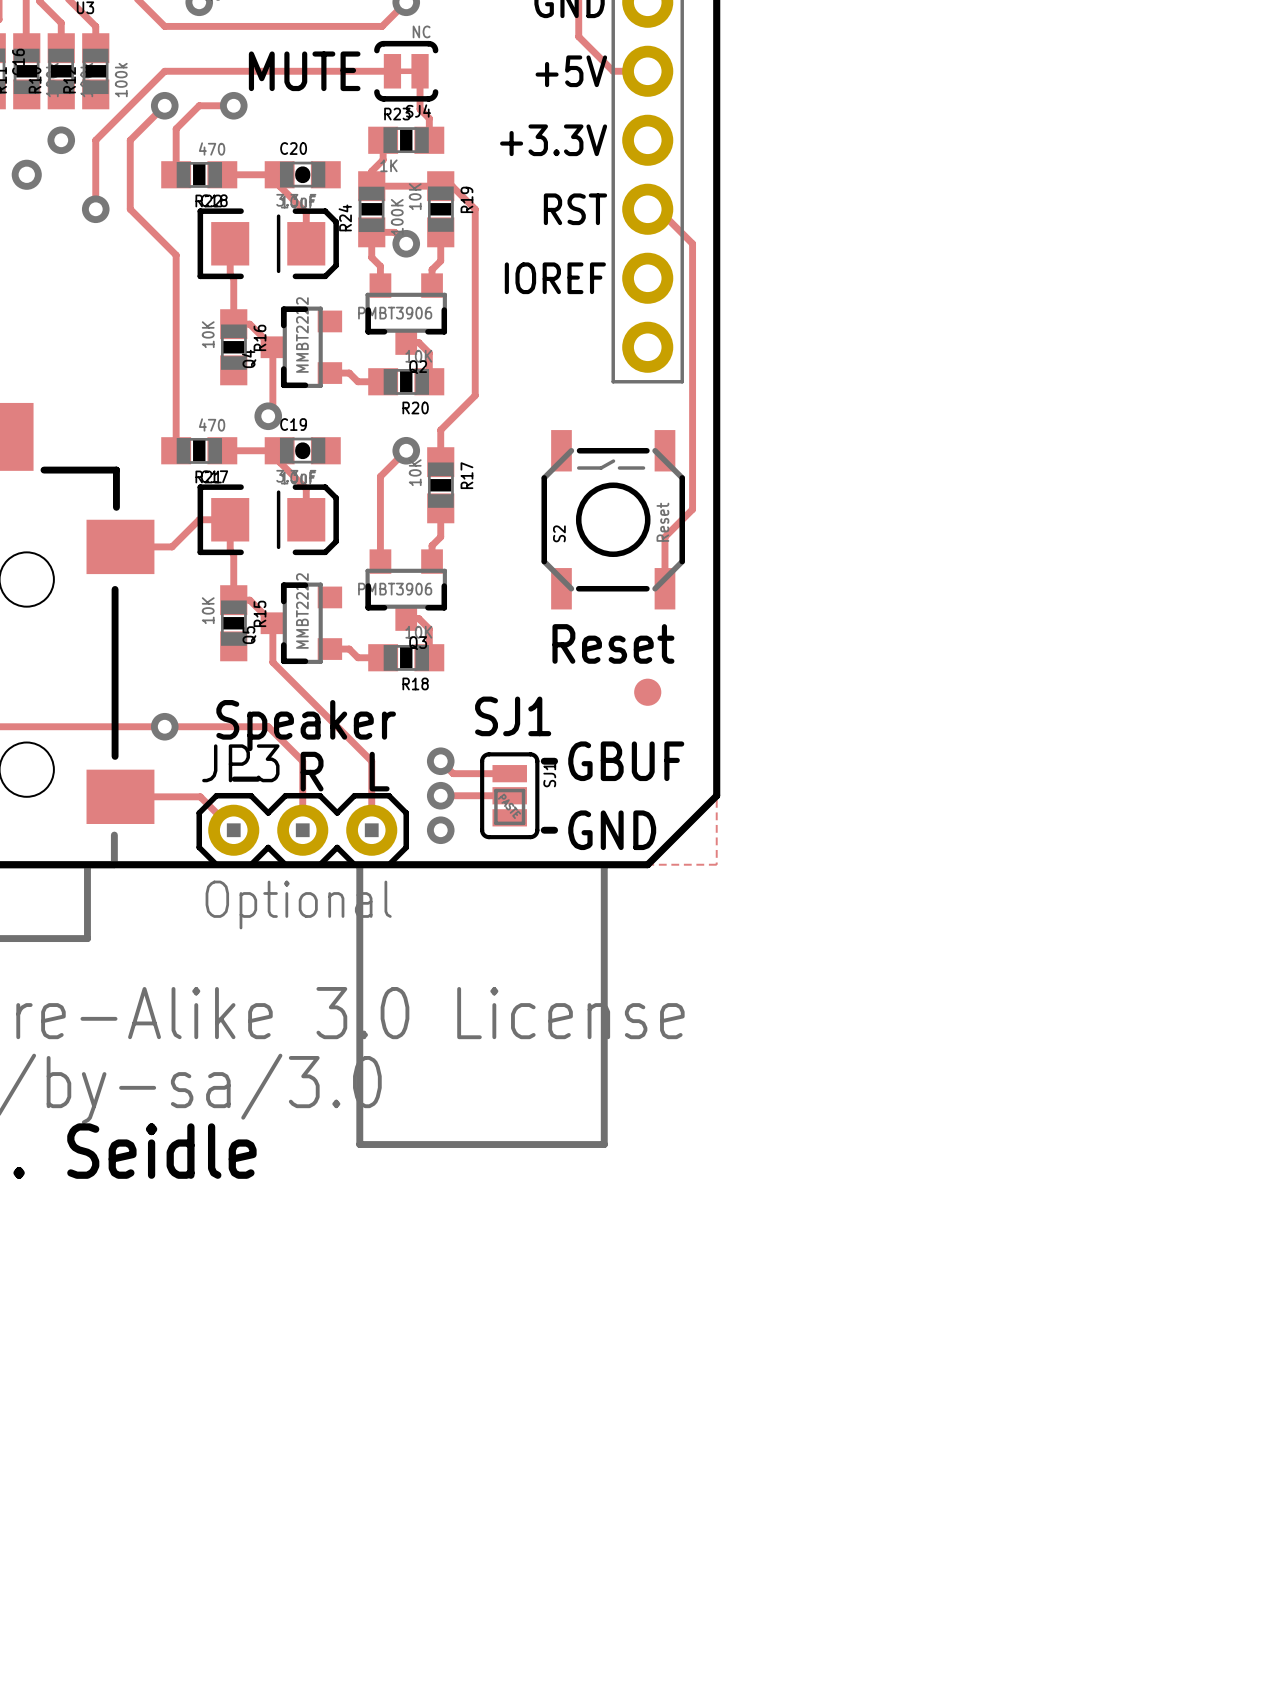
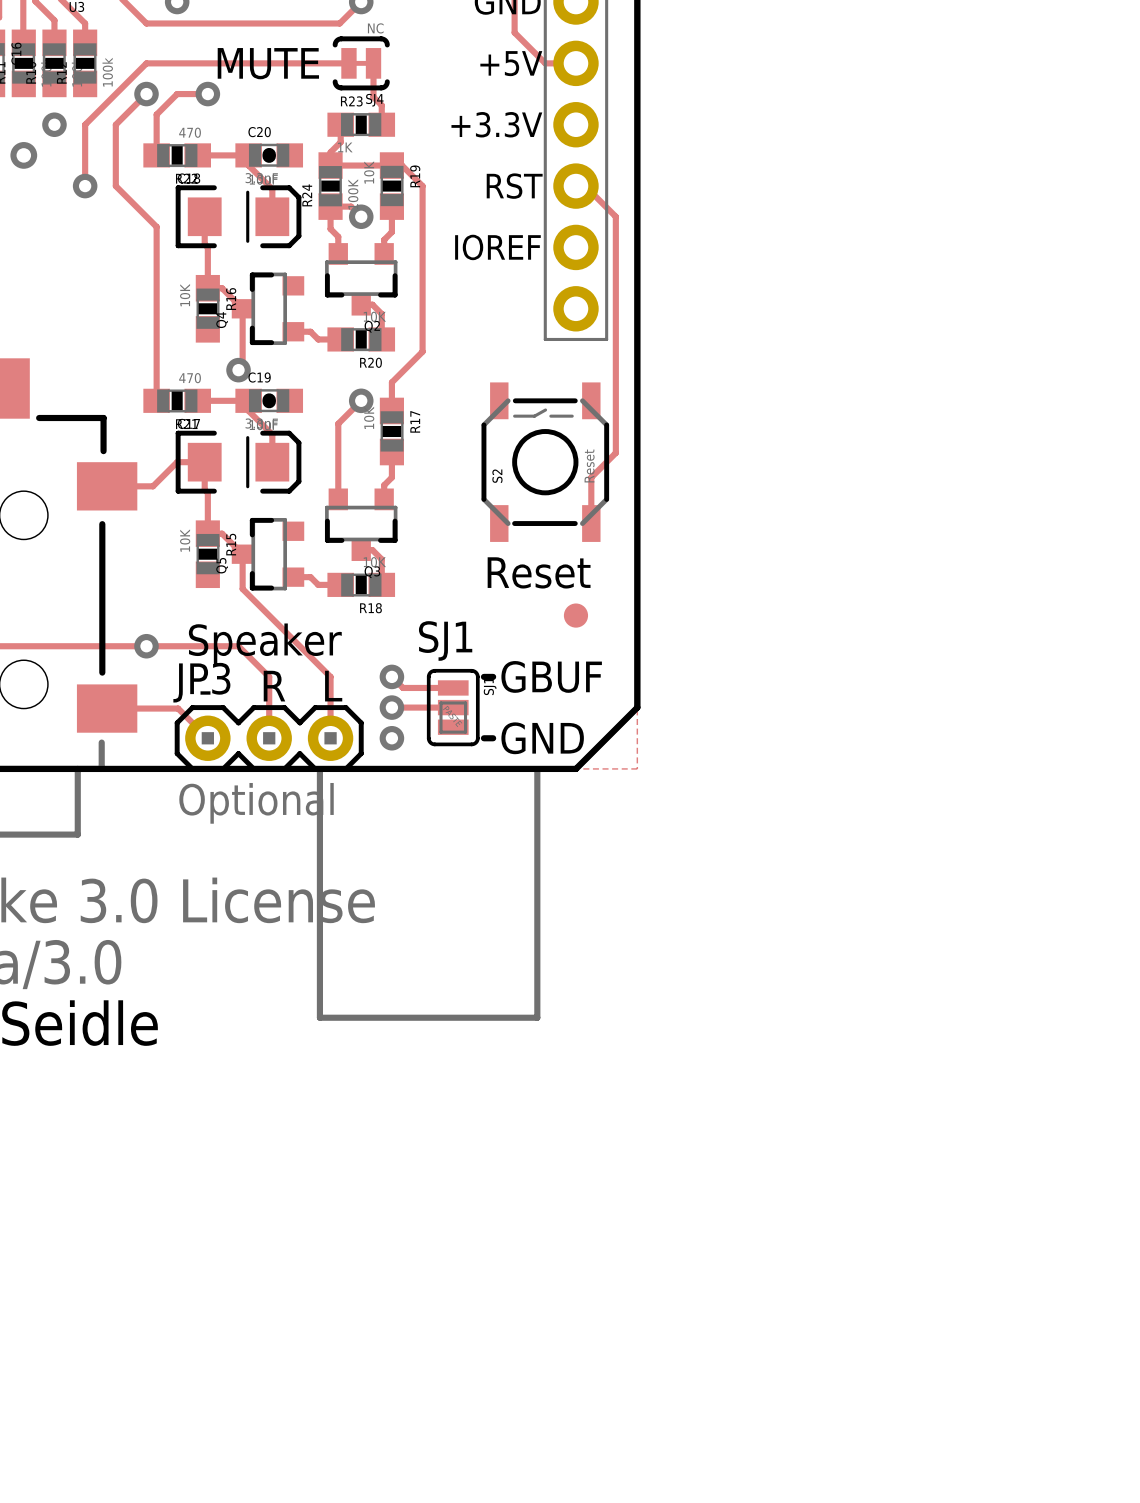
Q2 value: PMBT3906 (395, 313) -> none
Q4 value: MMBT2222 (302, 335) -> none
Q3 value: PMBT3906 (395, 589) -> none
Q5 value: MMBT2222 (302, 610) -> none

